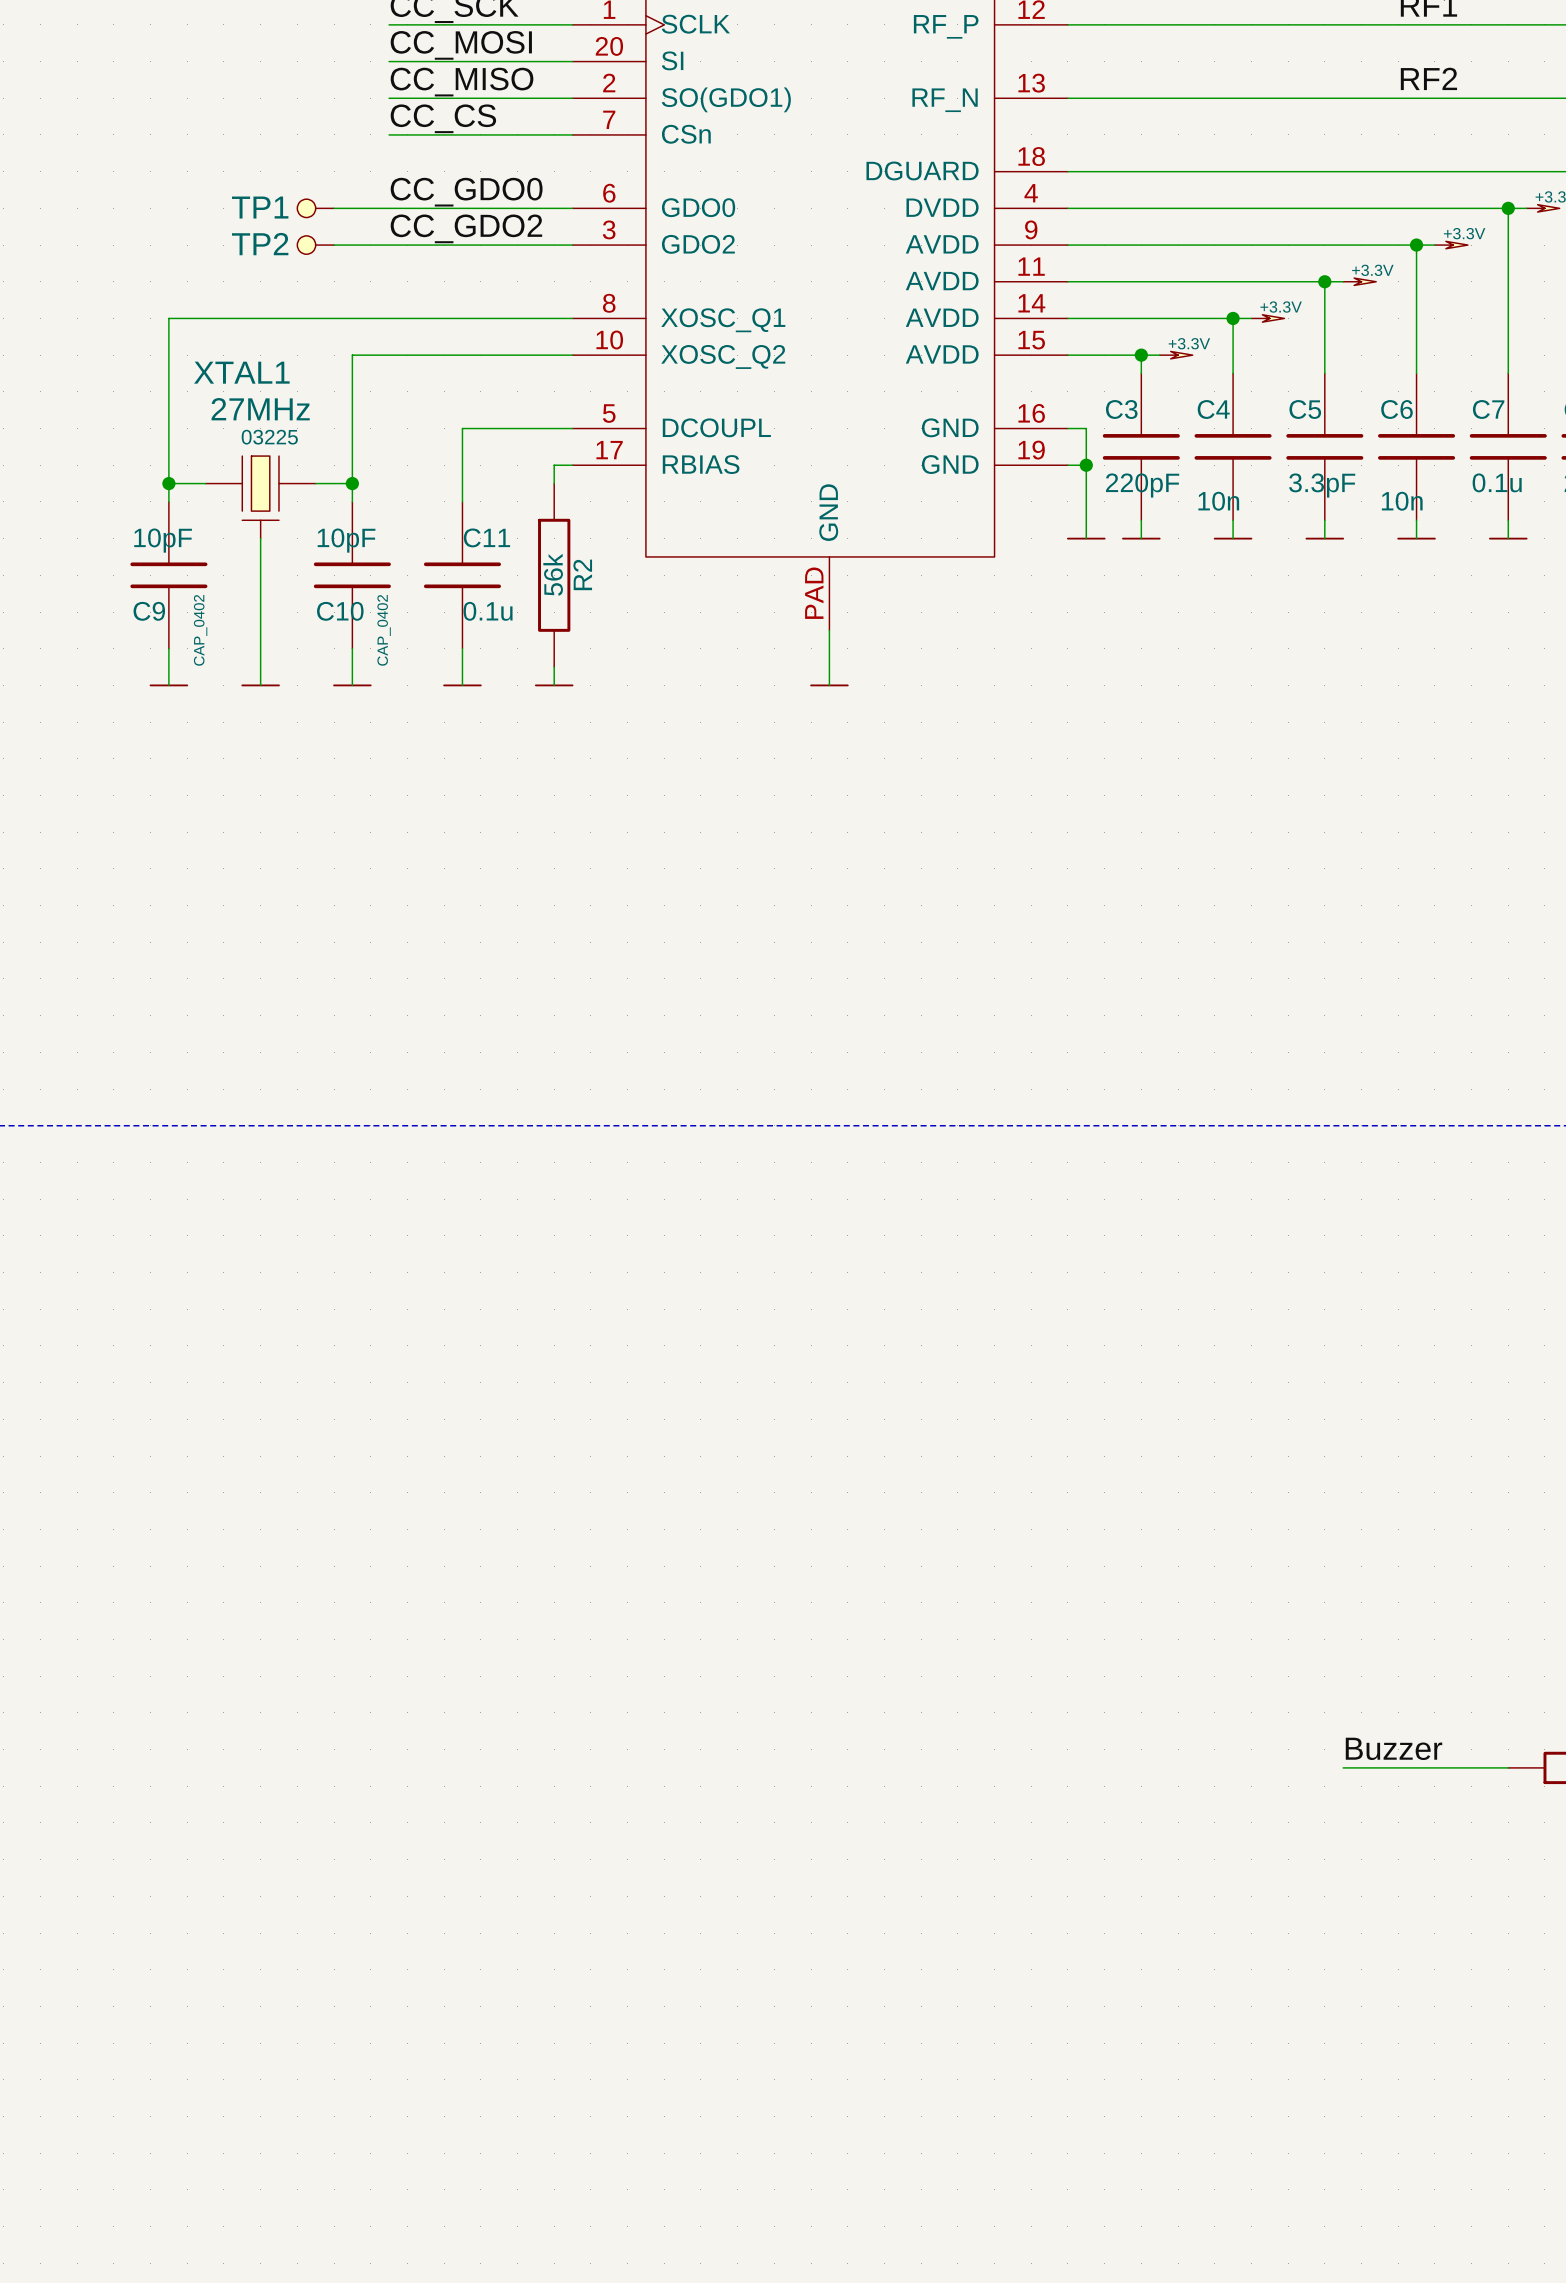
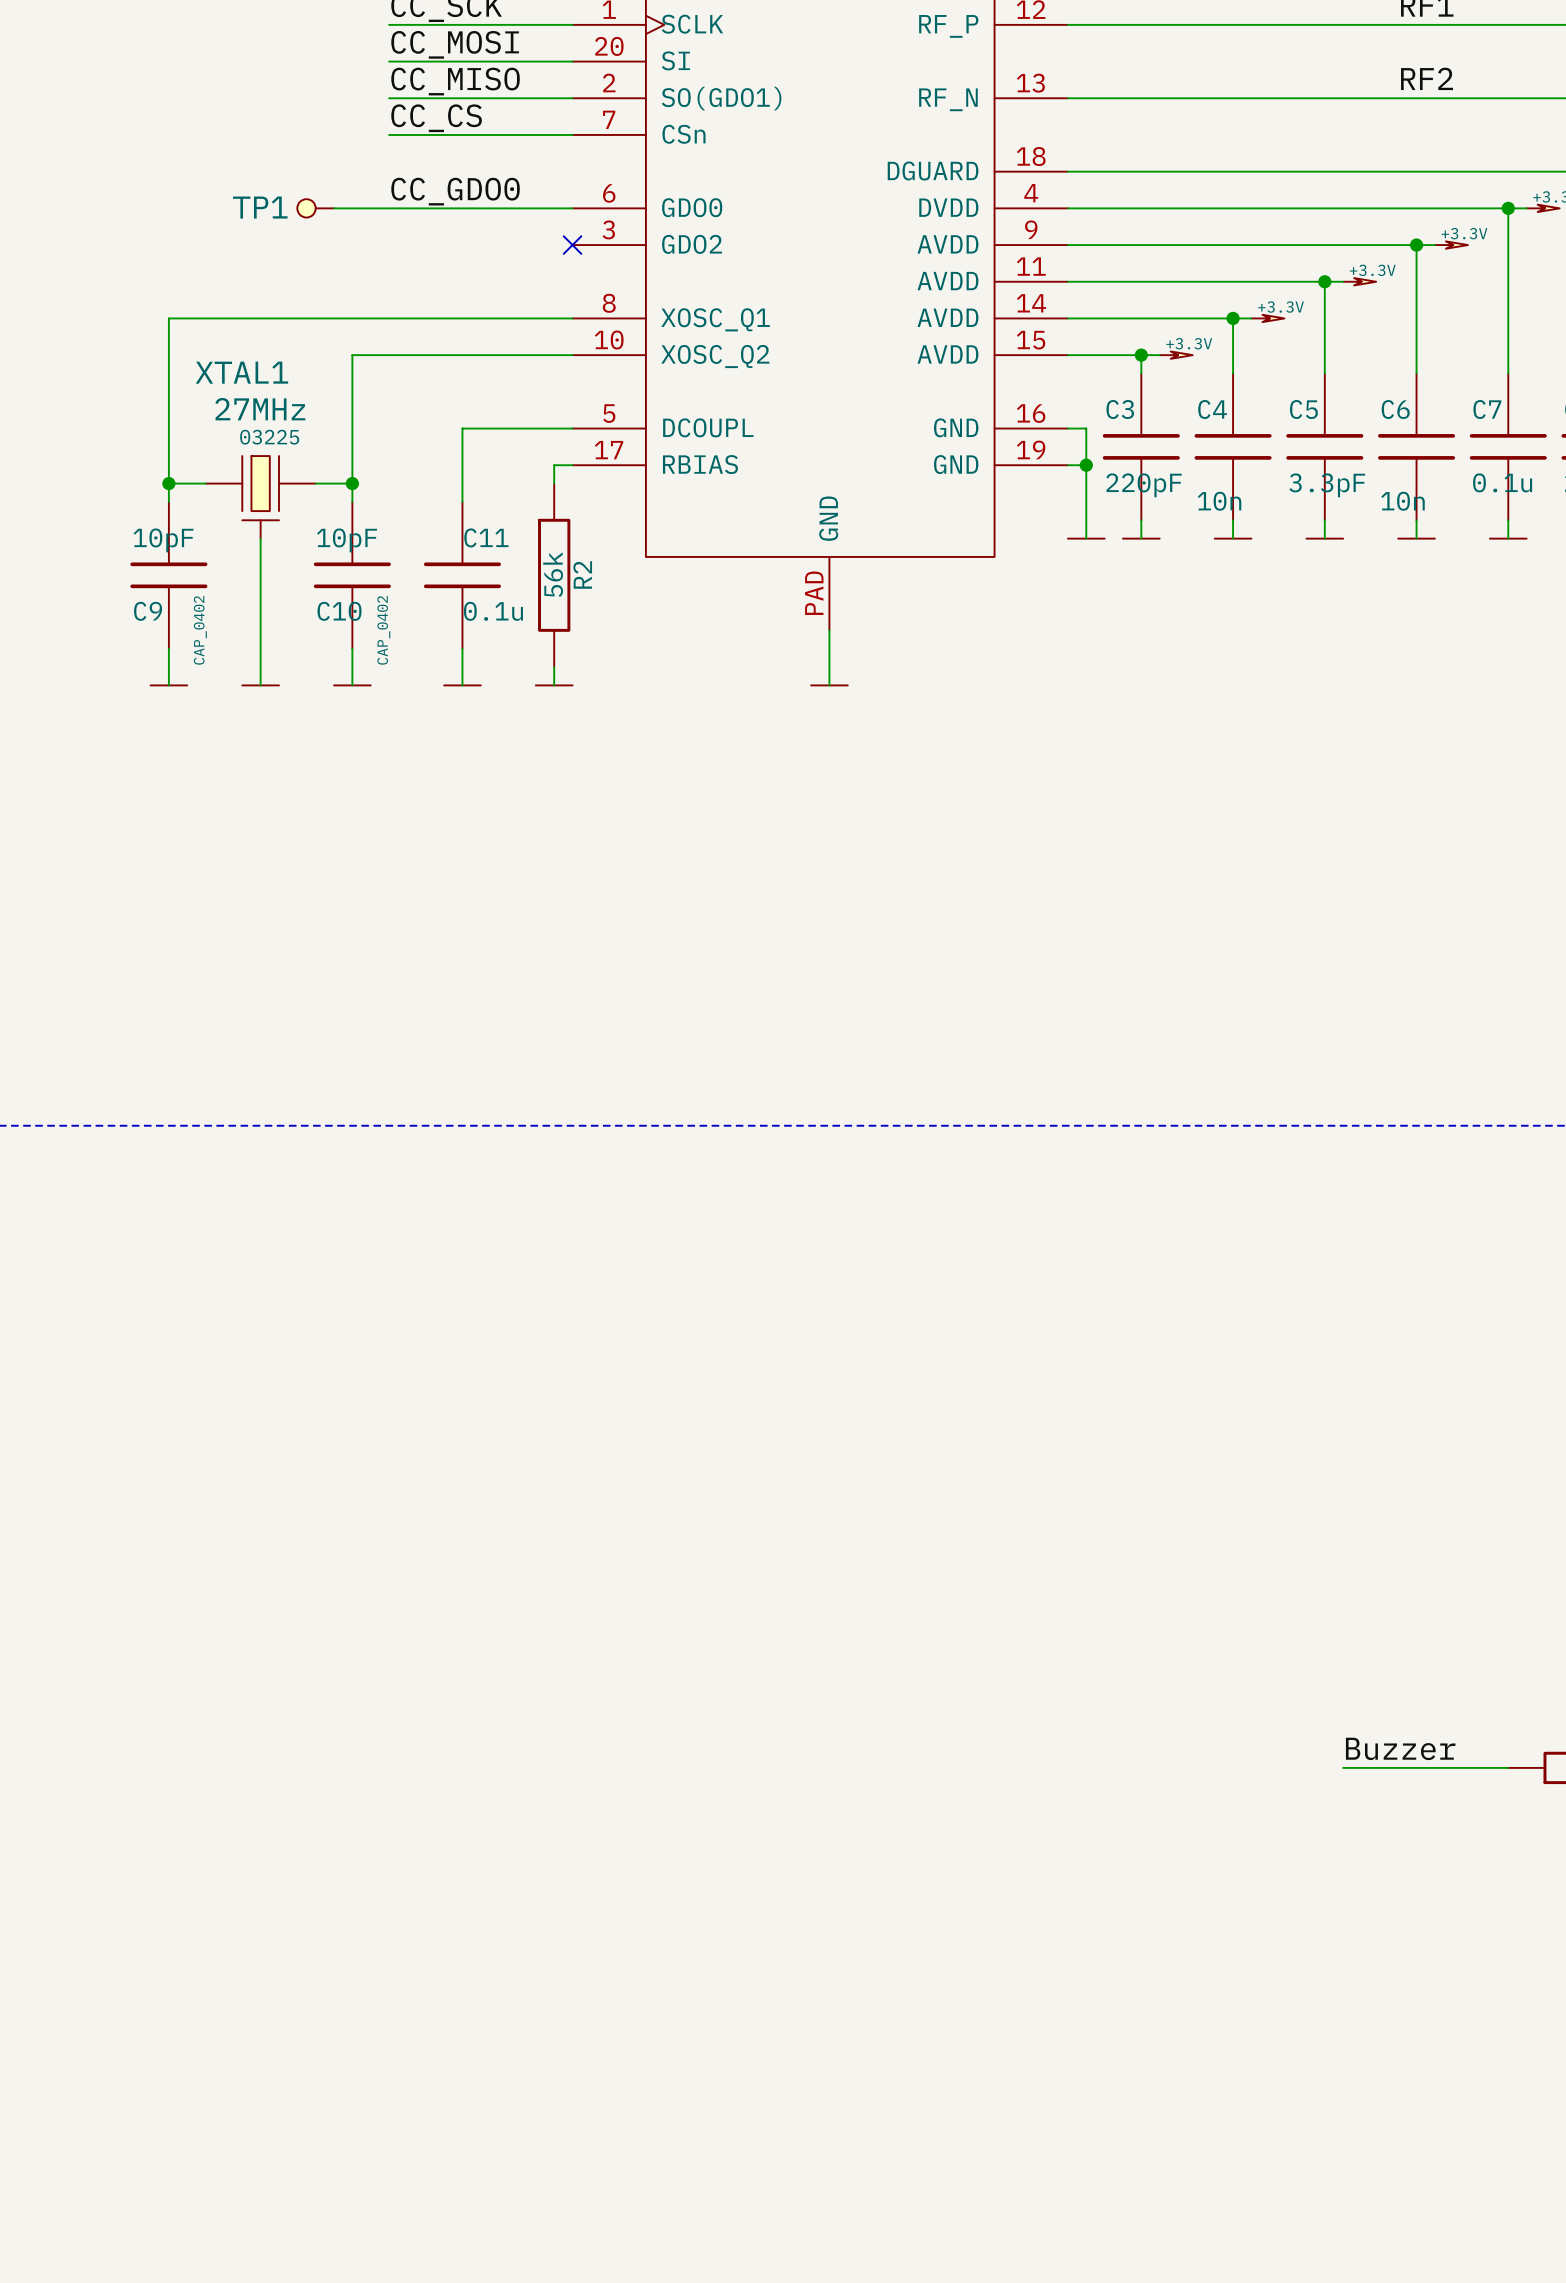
label: CC_GDO2 (466, 228) -> none
TP2: (315, 245) -> none
wire: (334, 245) (572, 245) -> none
no-connect mark: none -> (572, 245)

